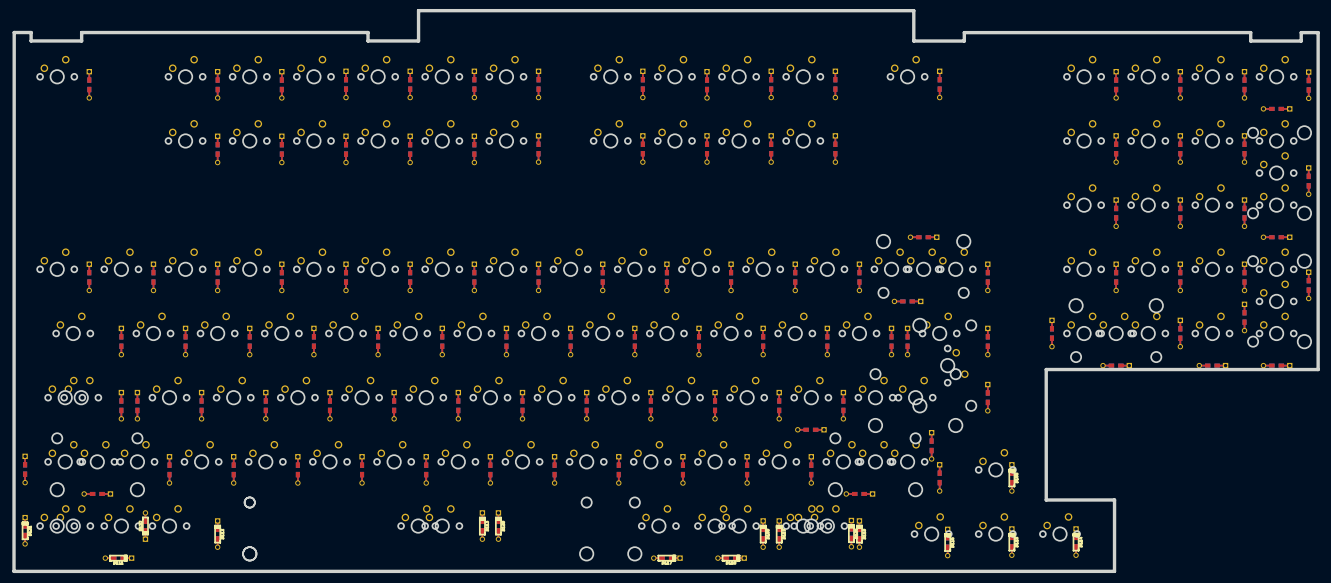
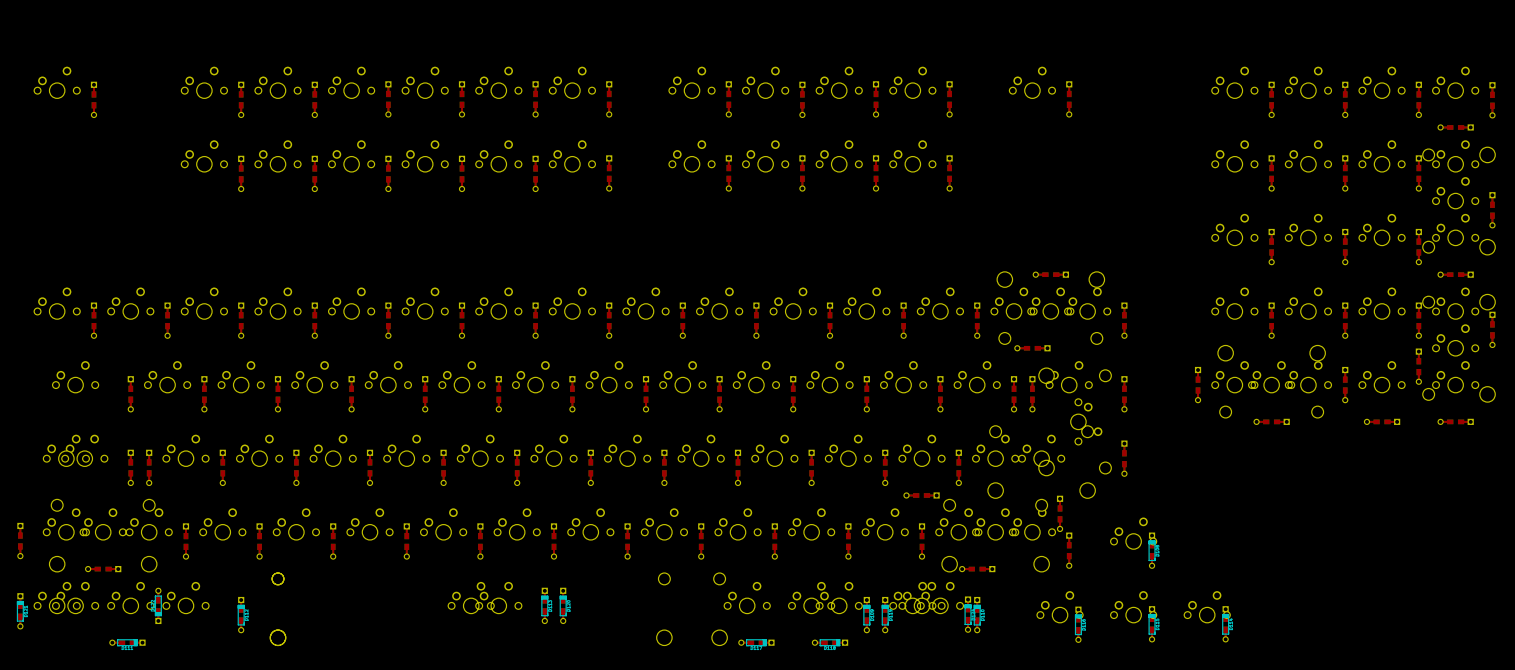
board edge: (418, 10) (418, 40) (368, 40) (368, 32) (81, 32) (81, 40) (31, 40) (31, 32) (14, 32) (14, 571) (1114, 571) (1114, 499) (1046, 500) (1046, 369) (1318, 369) (1318, 32) (1301, 32) (1301, 41) (1250, 41) (1250, 32) (964, 32) (964, 41) (913, 41) (913, 10) (418, 10) -> none

